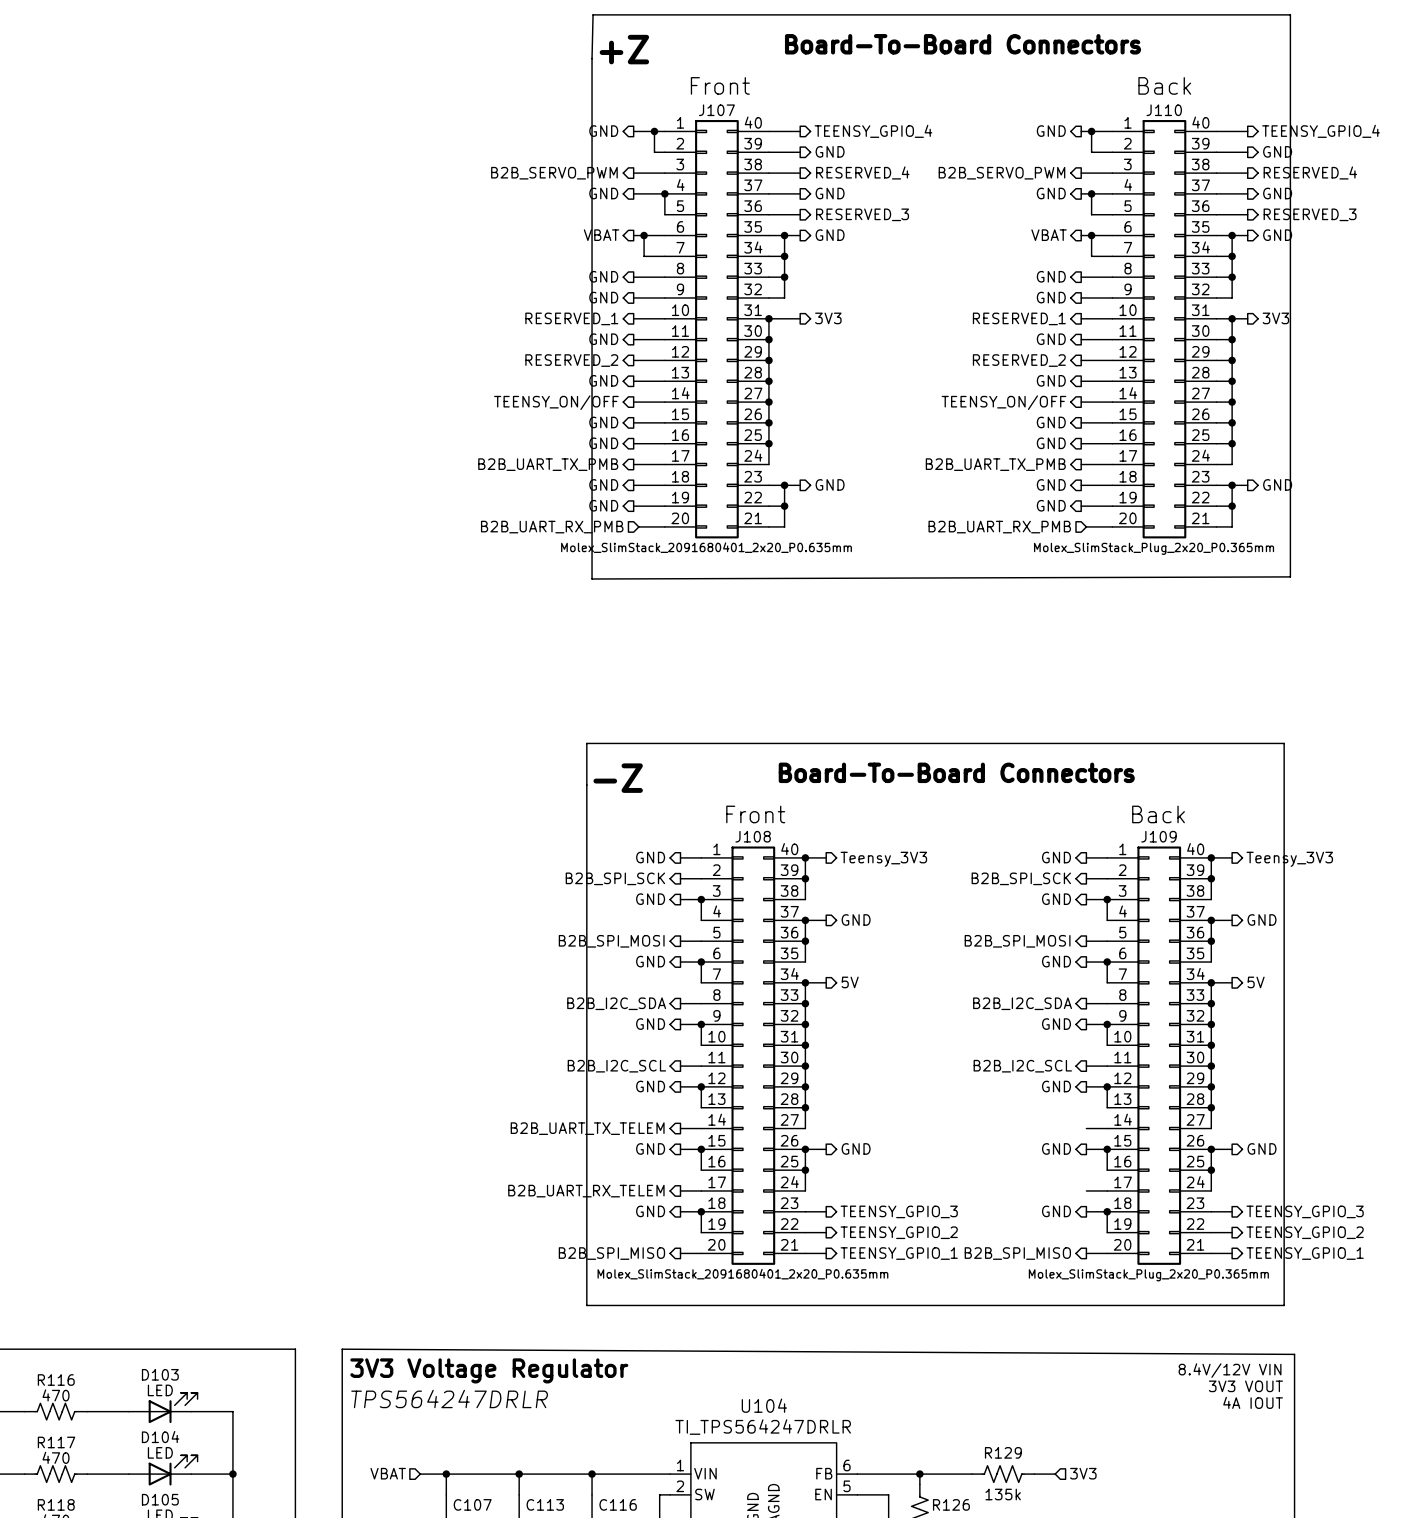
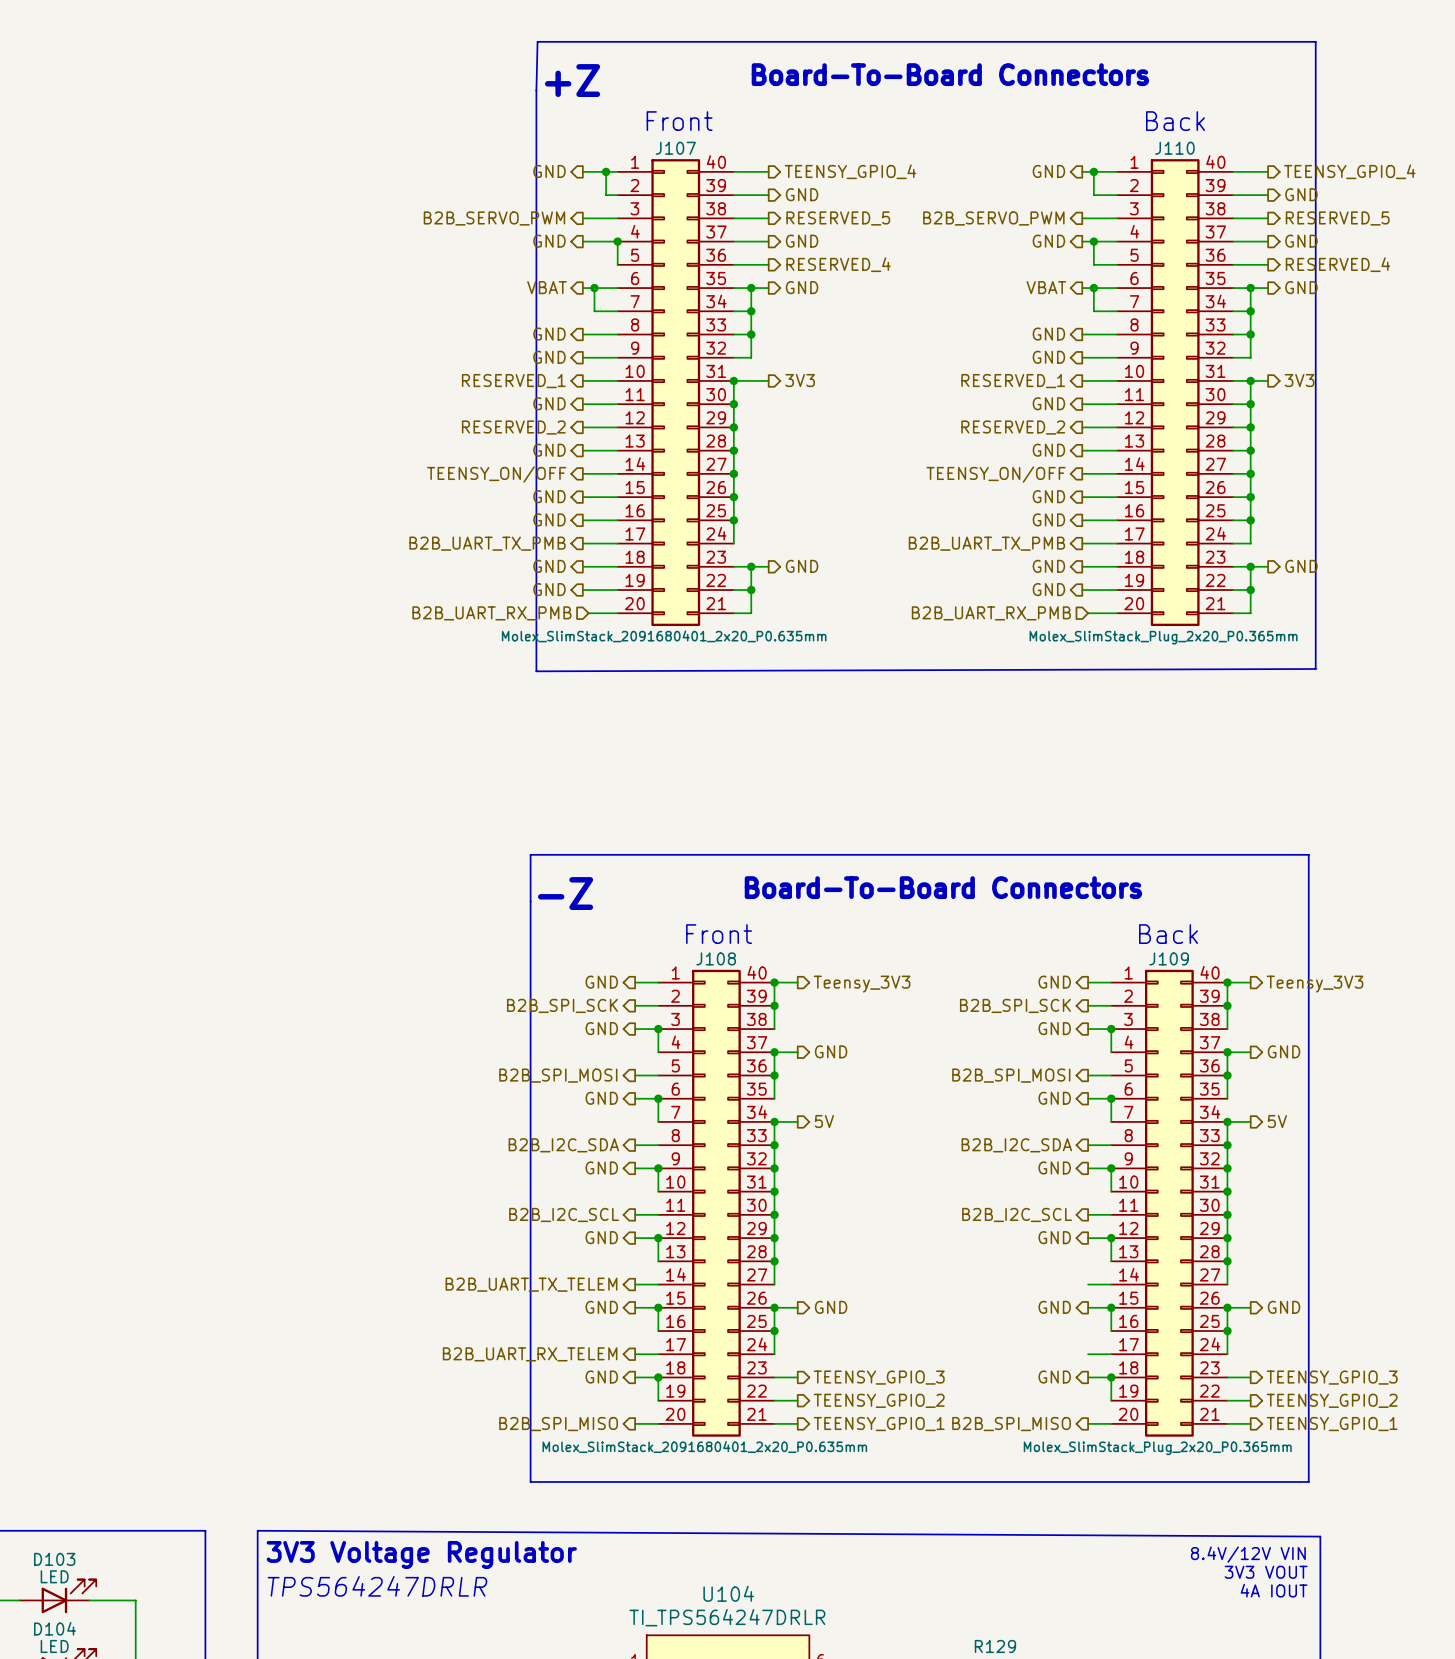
hierarchical label: RESERVED_4 (862, 172) -> RESERVED_5 (838, 218)
hierarchical label: RESERVED_4 (1310, 172) -> RESERVED_5 (1337, 218)
hierarchical label: RESERVED_3 (862, 214) -> RESERVED_4 (838, 264)
hierarchical label: RESERVED_3 (1310, 214) -> RESERVED_4 (1337, 264)

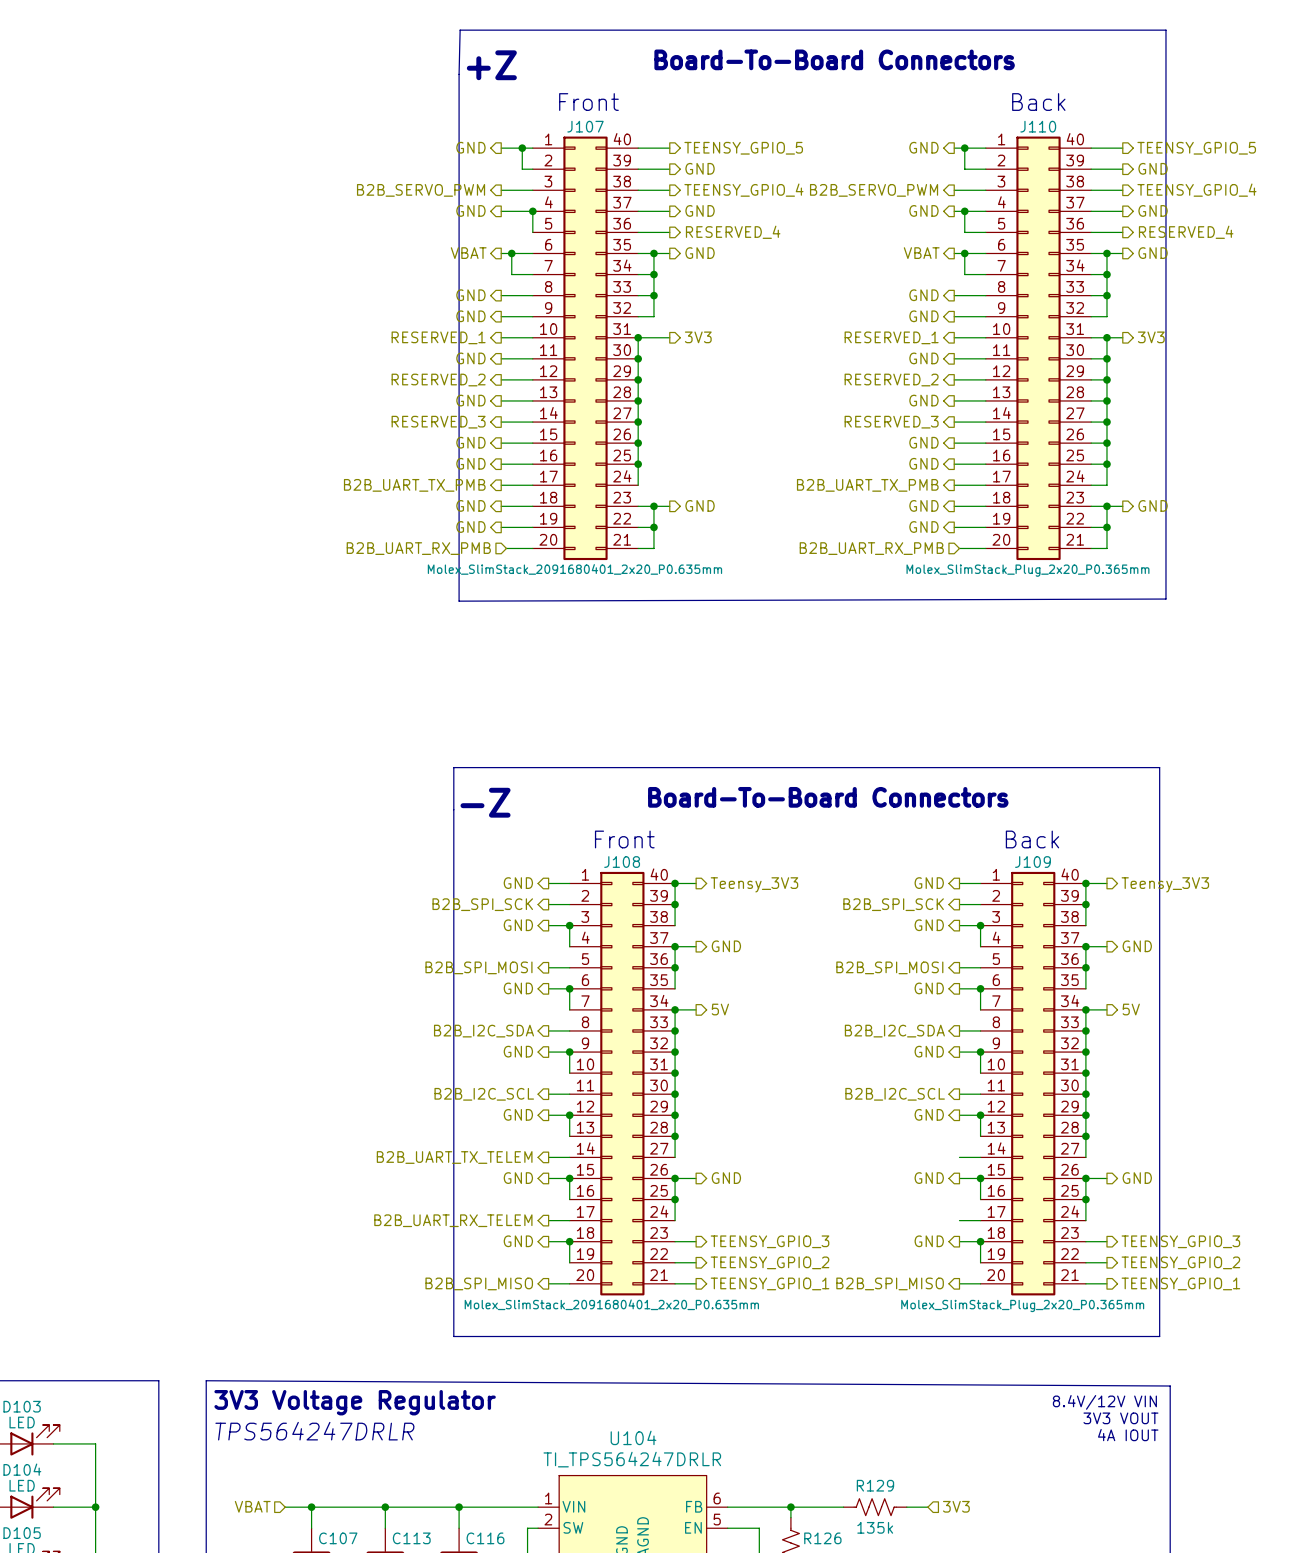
hierarchical label: TEENSY_GPIO_4 (850, 171) -> TEENSY_GPIO_5 (743, 148)
hierarchical label: TEENSY_GPIO_4 (1349, 171) -> TEENSY_GPIO_5 (1196, 148)
hierarchical label: RESERVED_5 (838, 218) -> TEENSY_GPIO_4 (743, 190)
hierarchical label: RESERVED_5 (1337, 218) -> TEENSY_GPIO_4 (1196, 190)
hierarchical label: TEENSY_ON/OFF (496, 474) -> RESERVED_3 (438, 422)
hierarchical label: TEENSY_ON/OFF (996, 474) -> RESERVED_3 (891, 422)

